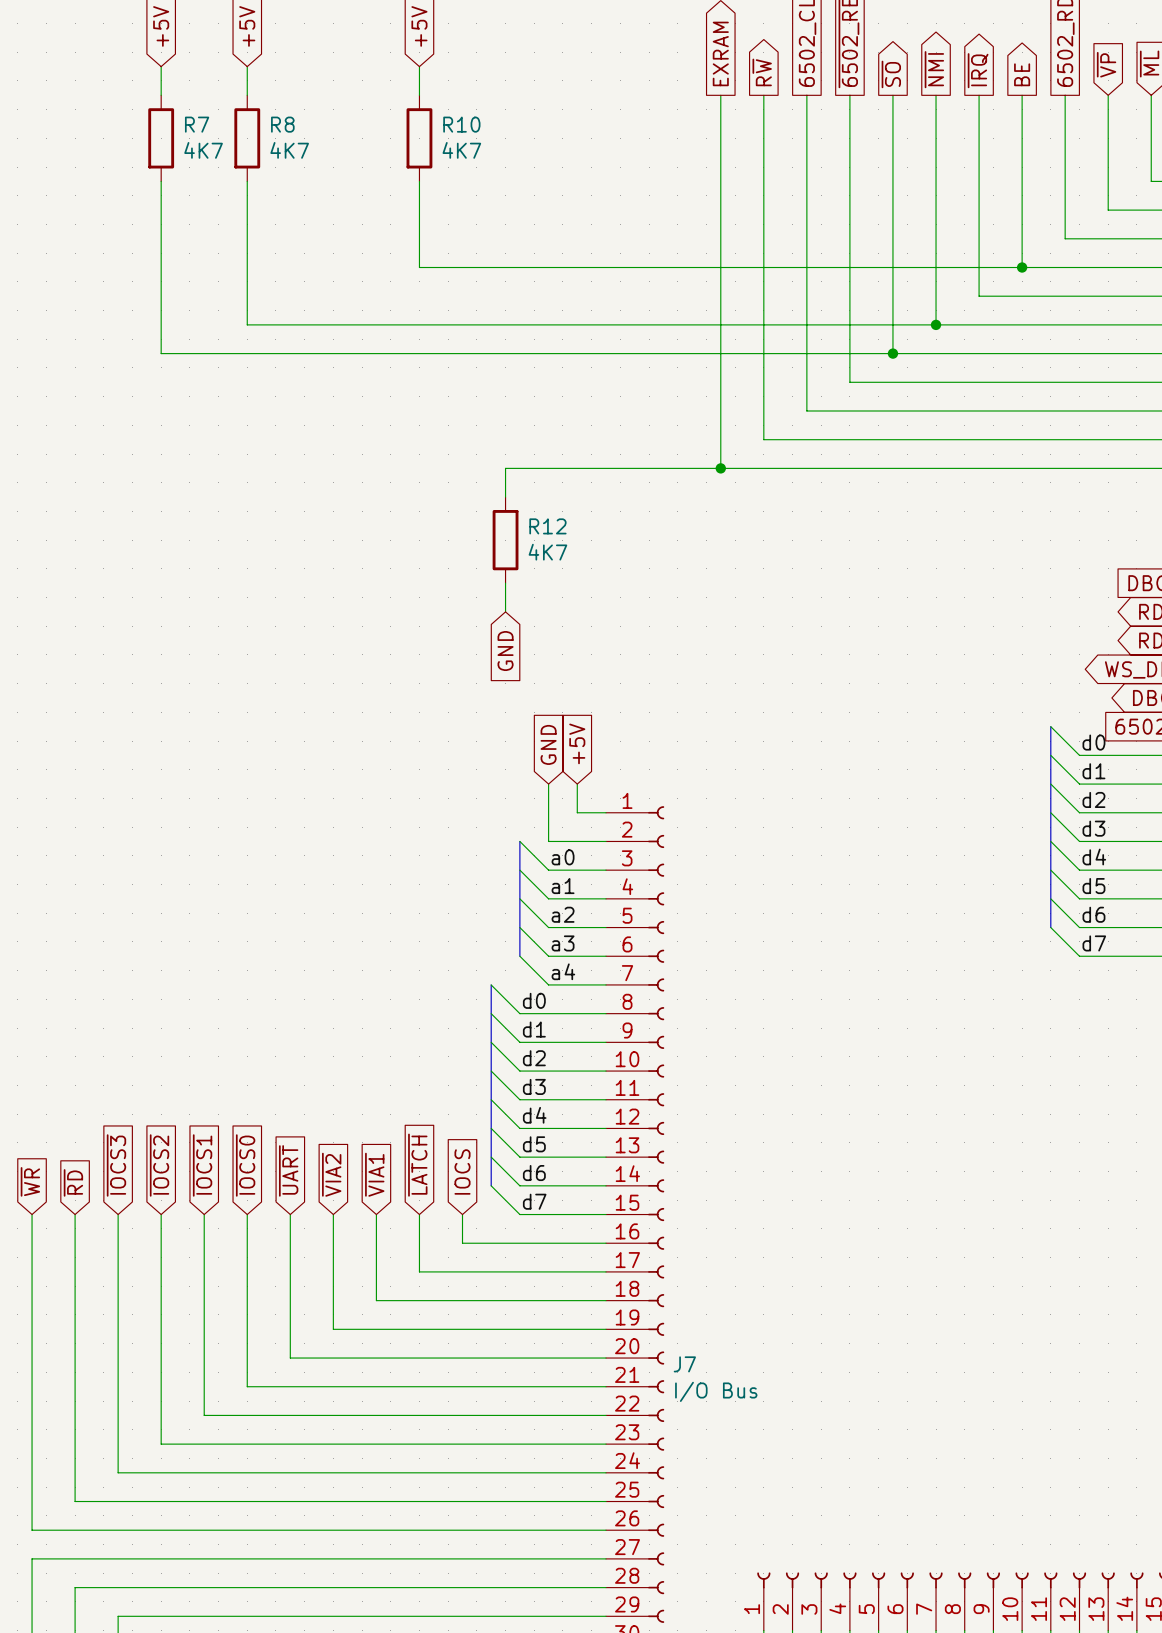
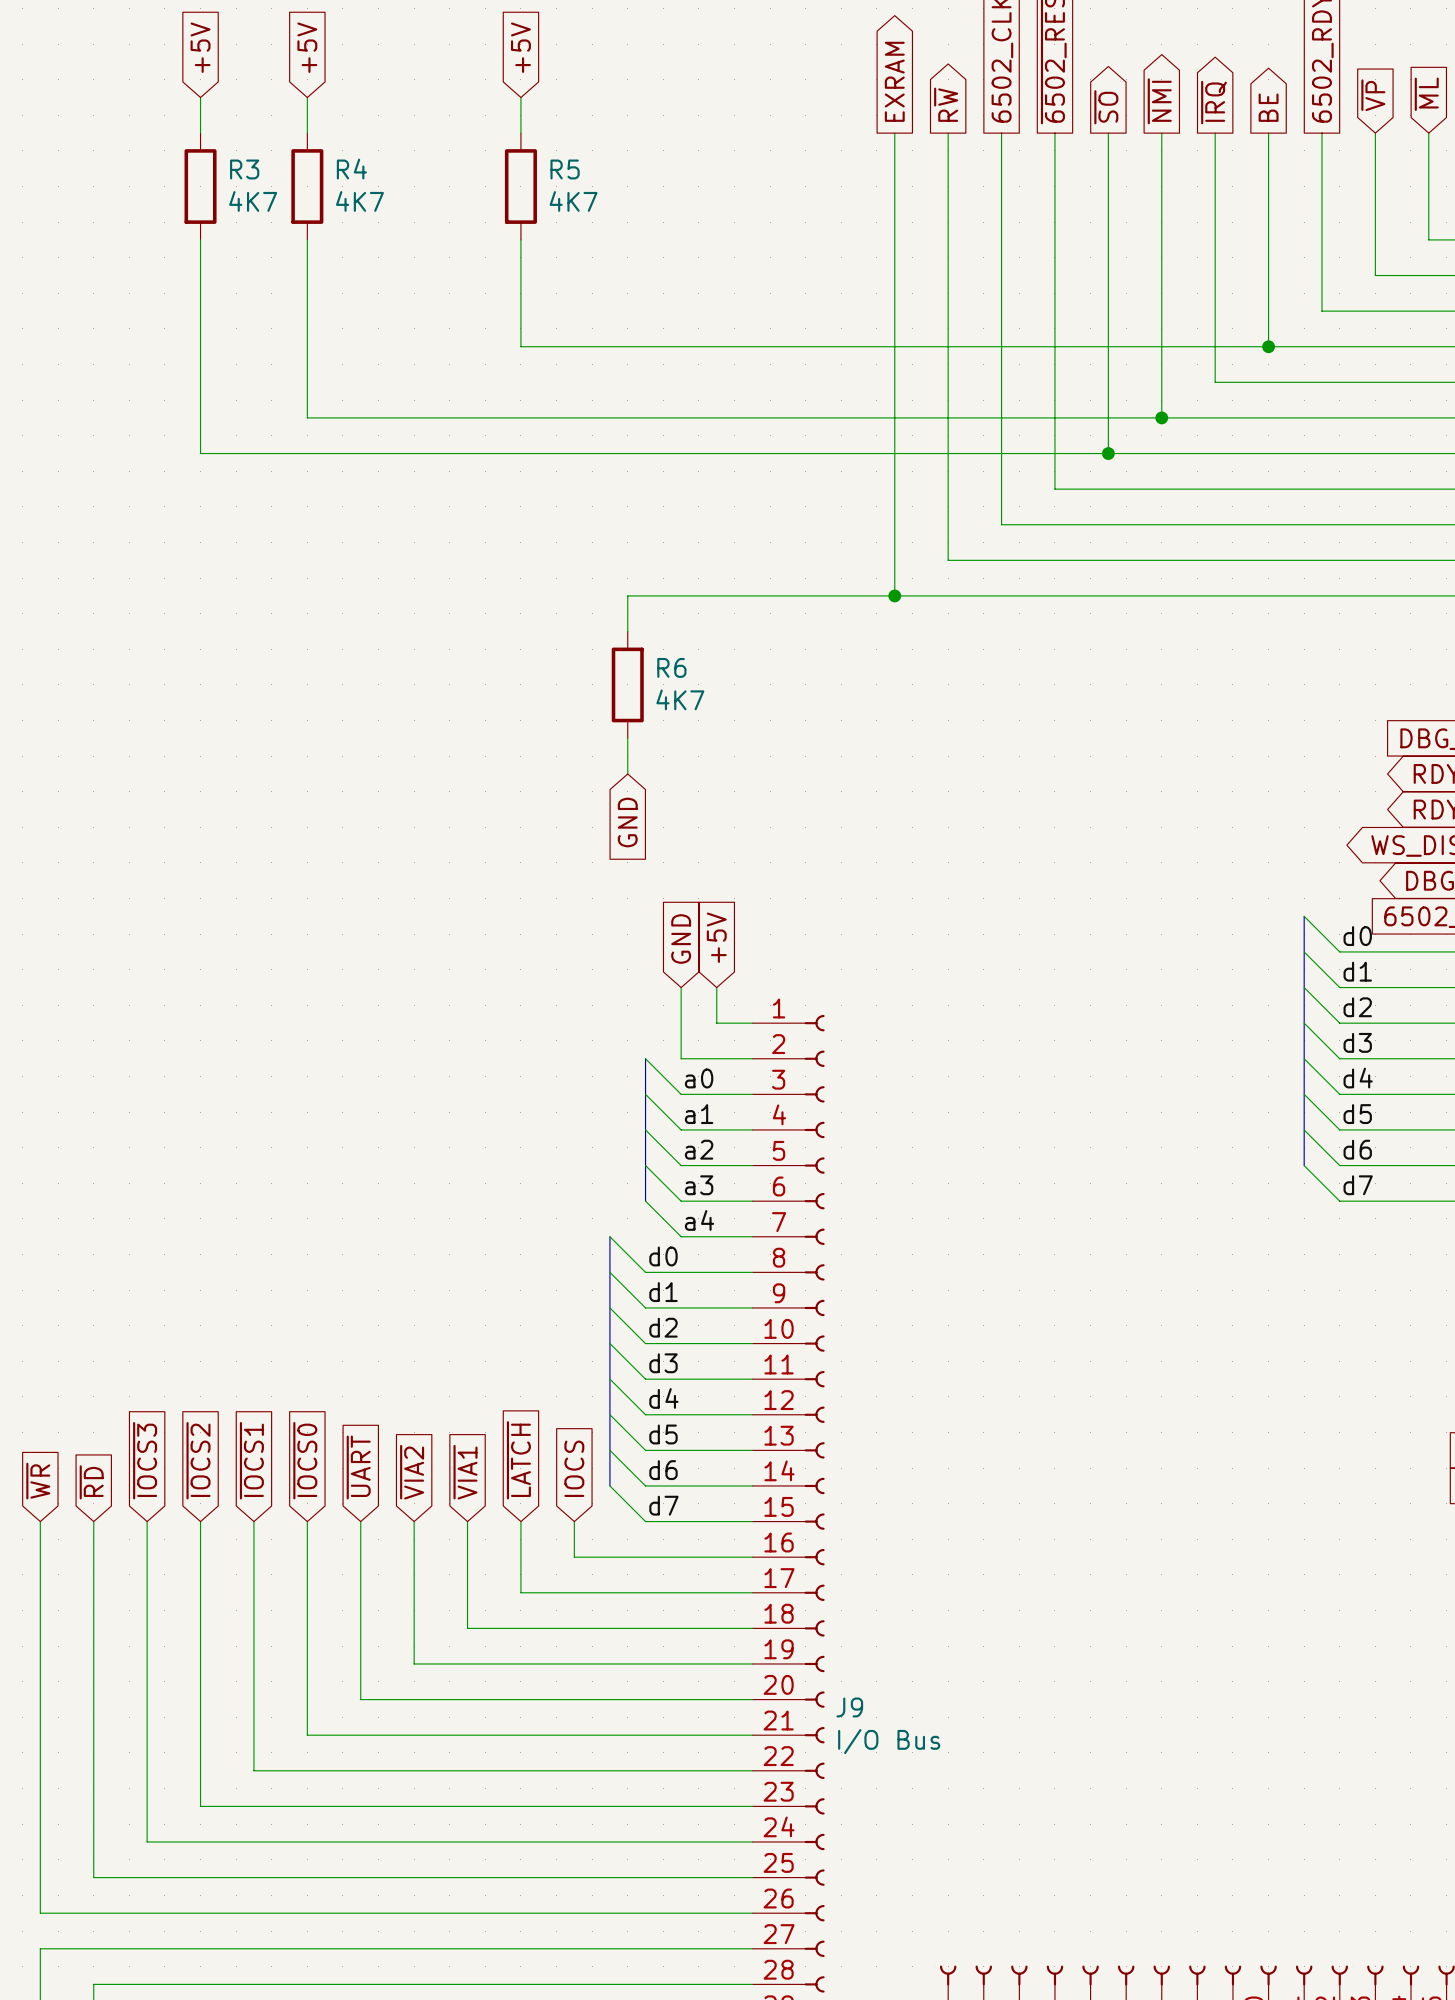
R7 name: R7 (197, 124) -> R3 (244, 169)
R8 name: R8 (282, 124) -> R4 (351, 169)
R10 name: R10 (461, 124) -> R5 (565, 169)
R12 name: R12 (547, 526) -> R6 (671, 667)
J7 name: J7 (684, 1364) -> J9 (849, 1707)

